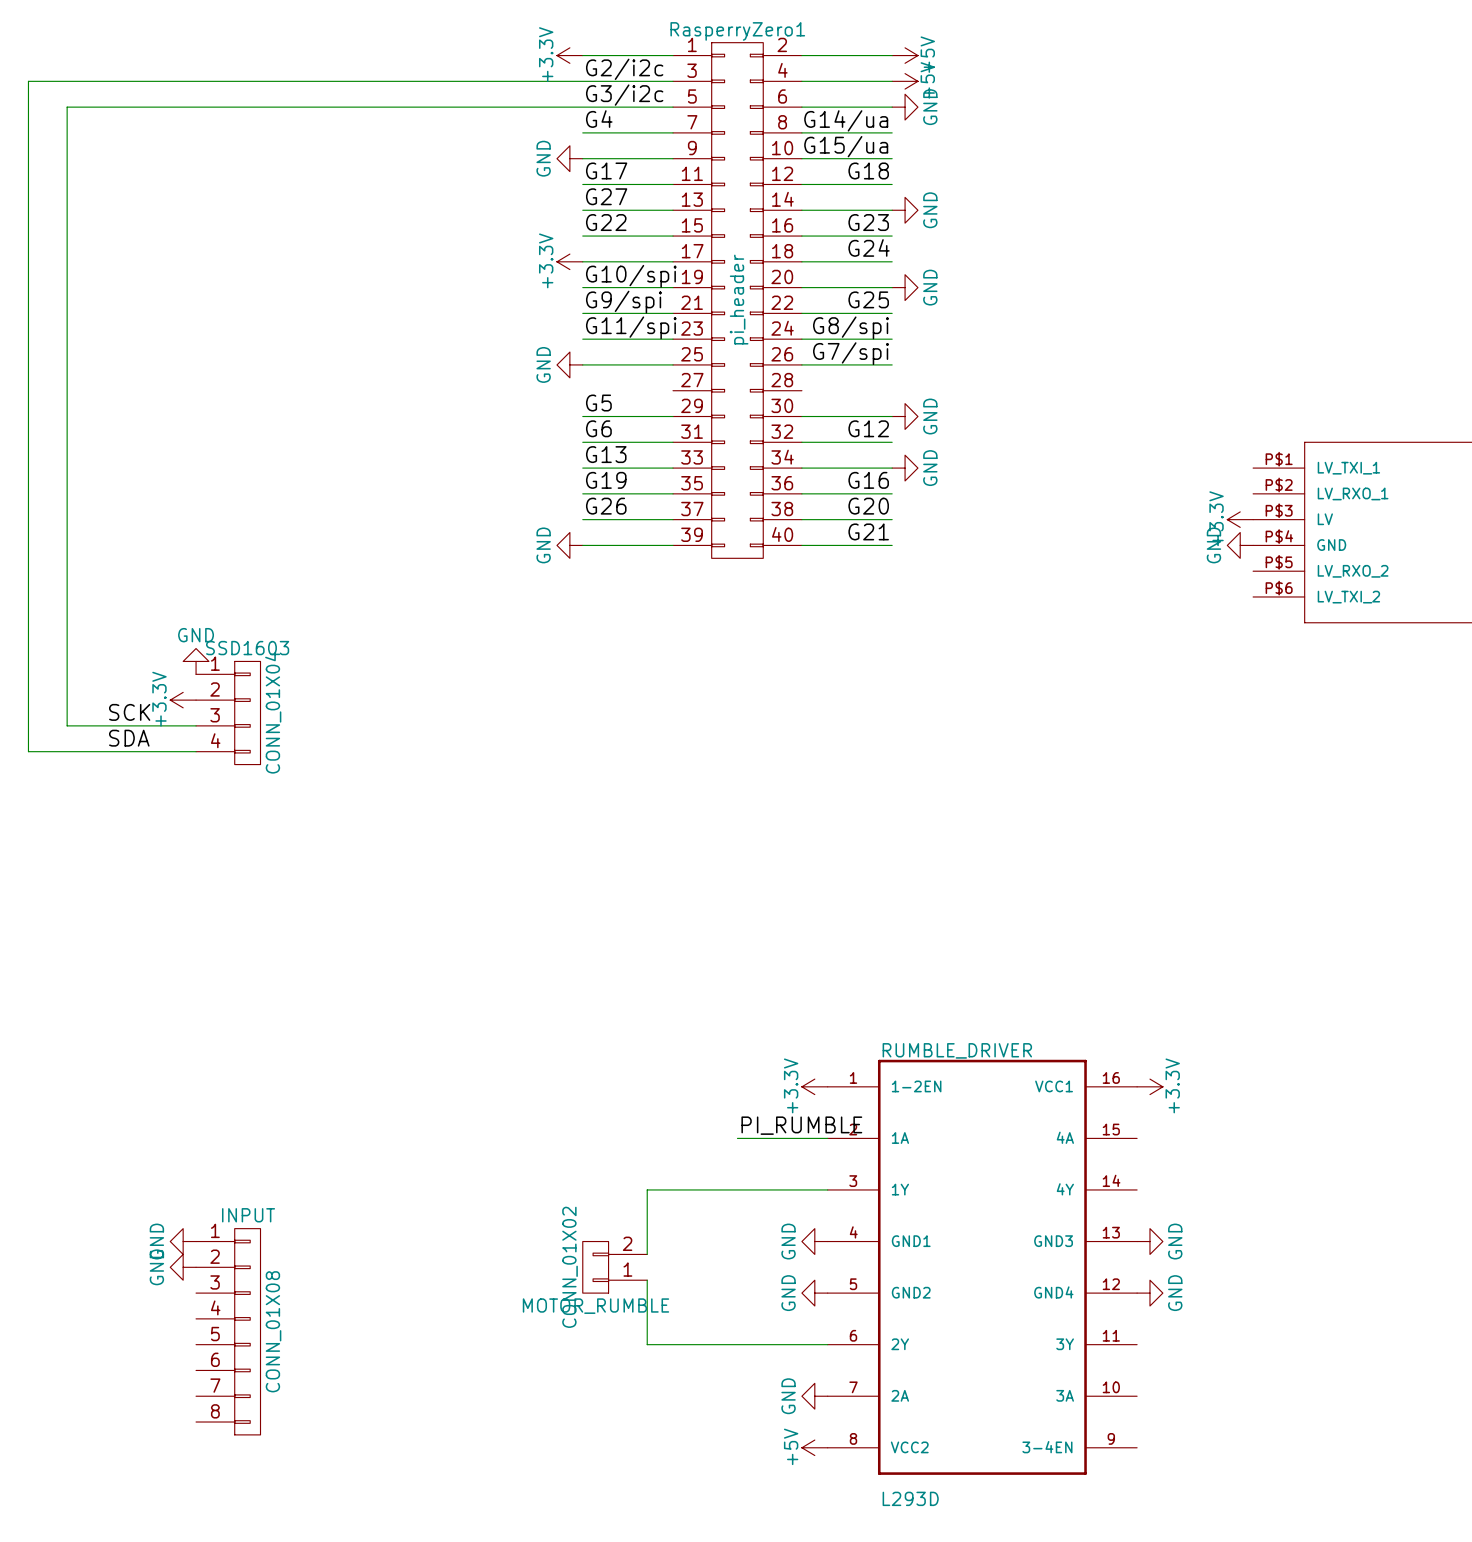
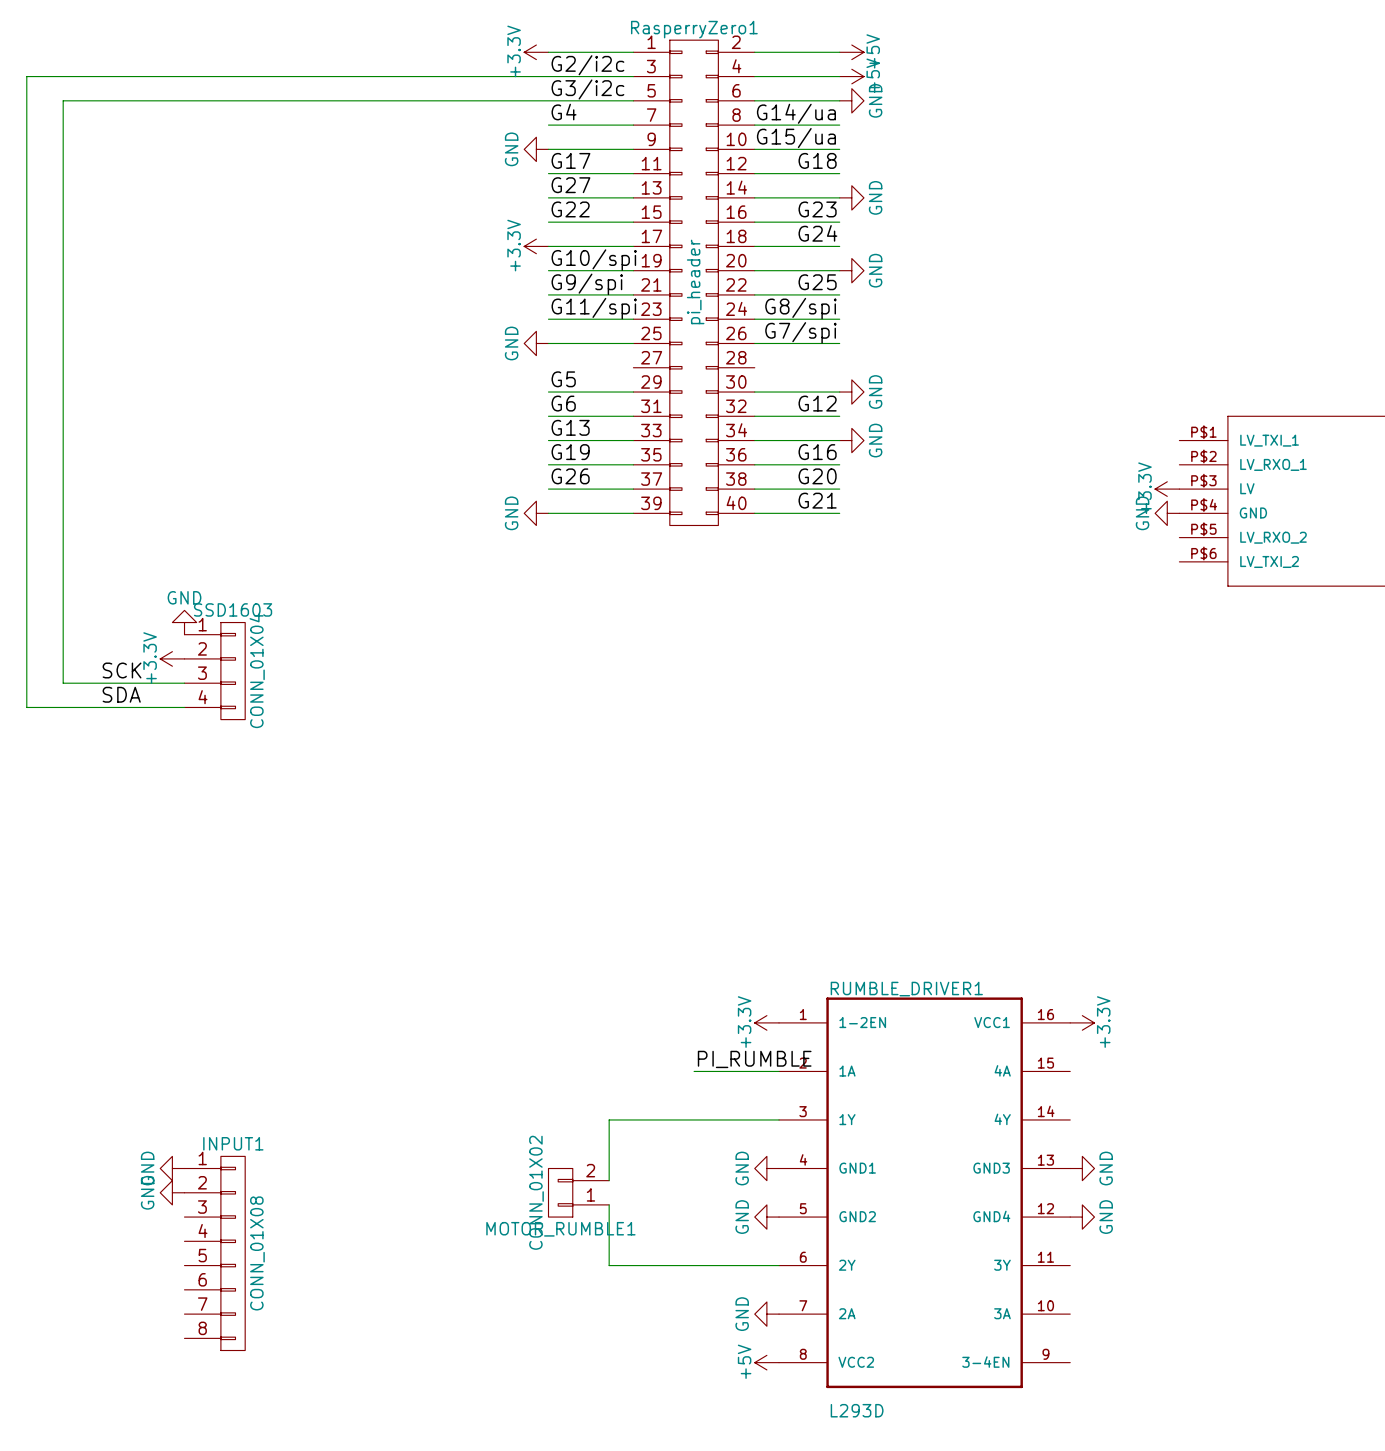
RUMBLE_DRIVER name: RUMBLE_DRIVER (957, 1050) -> RUMBLE_DRIVER1 (906, 989)
INPUT name: INPUT (248, 1215) -> INPUT1 (233, 1143)
MOTOR_RUMBLE name: MOTOR_RUMBLE (595, 1306) -> MOTOR_RUMBLE1 (560, 1229)

